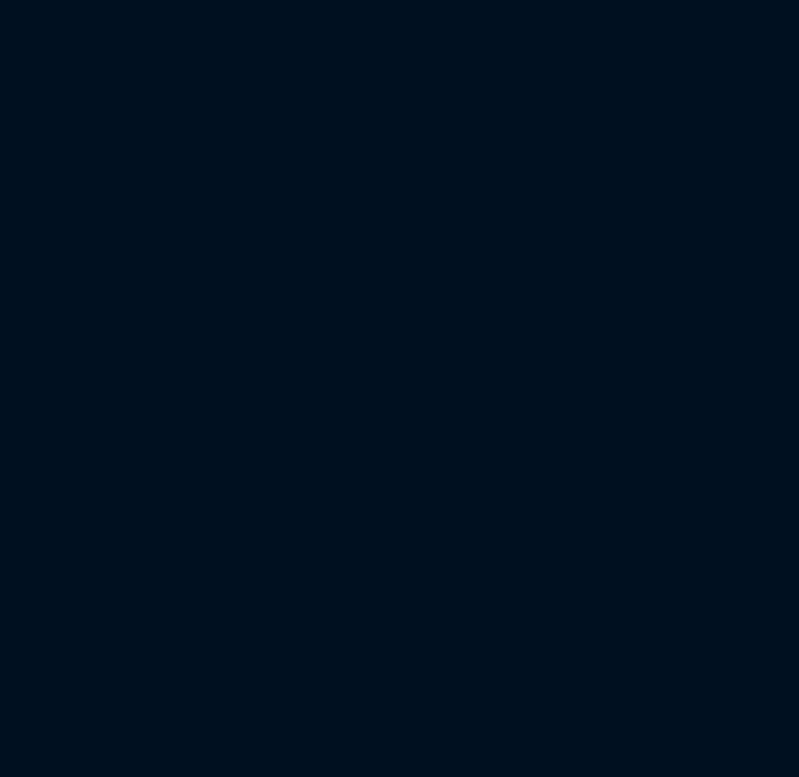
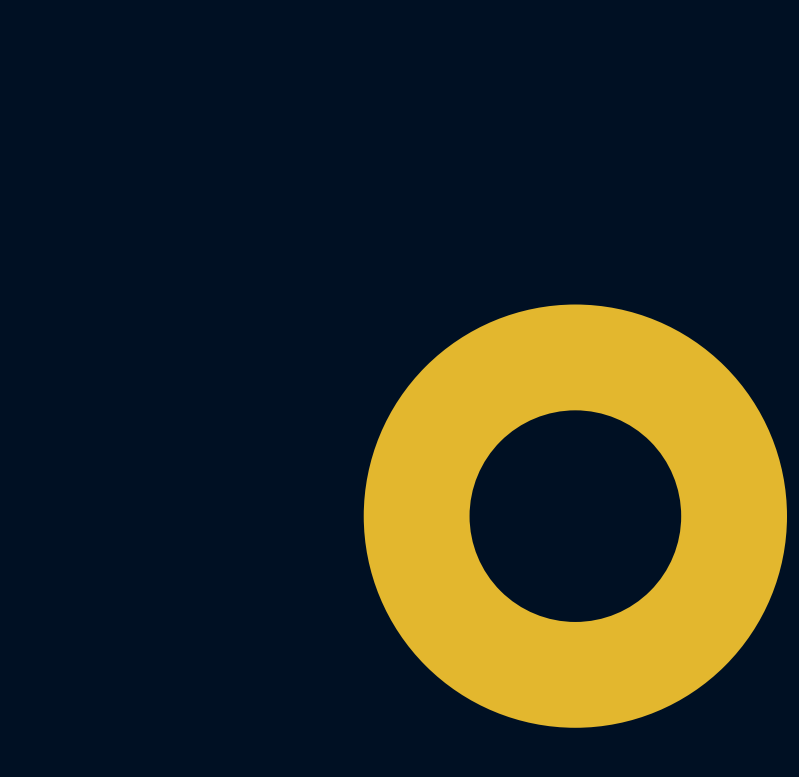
part: none -> (575, 516)

